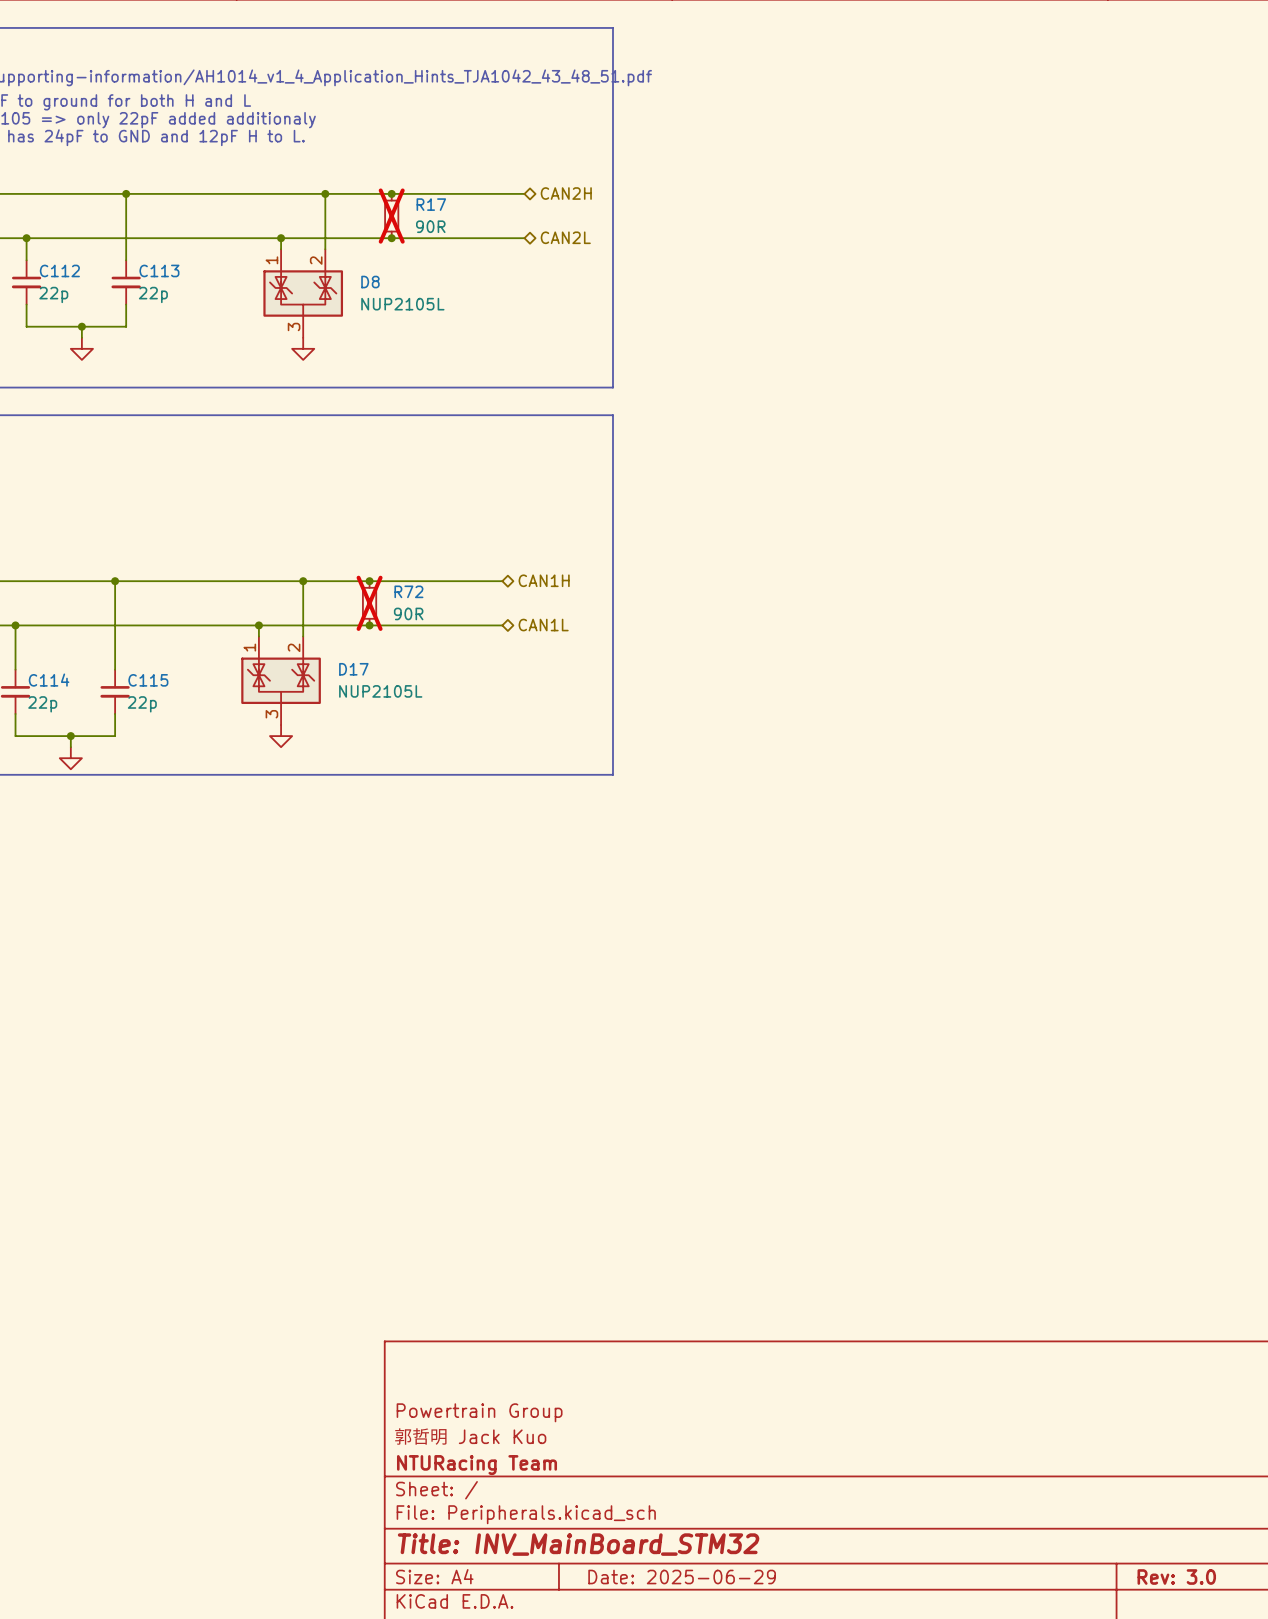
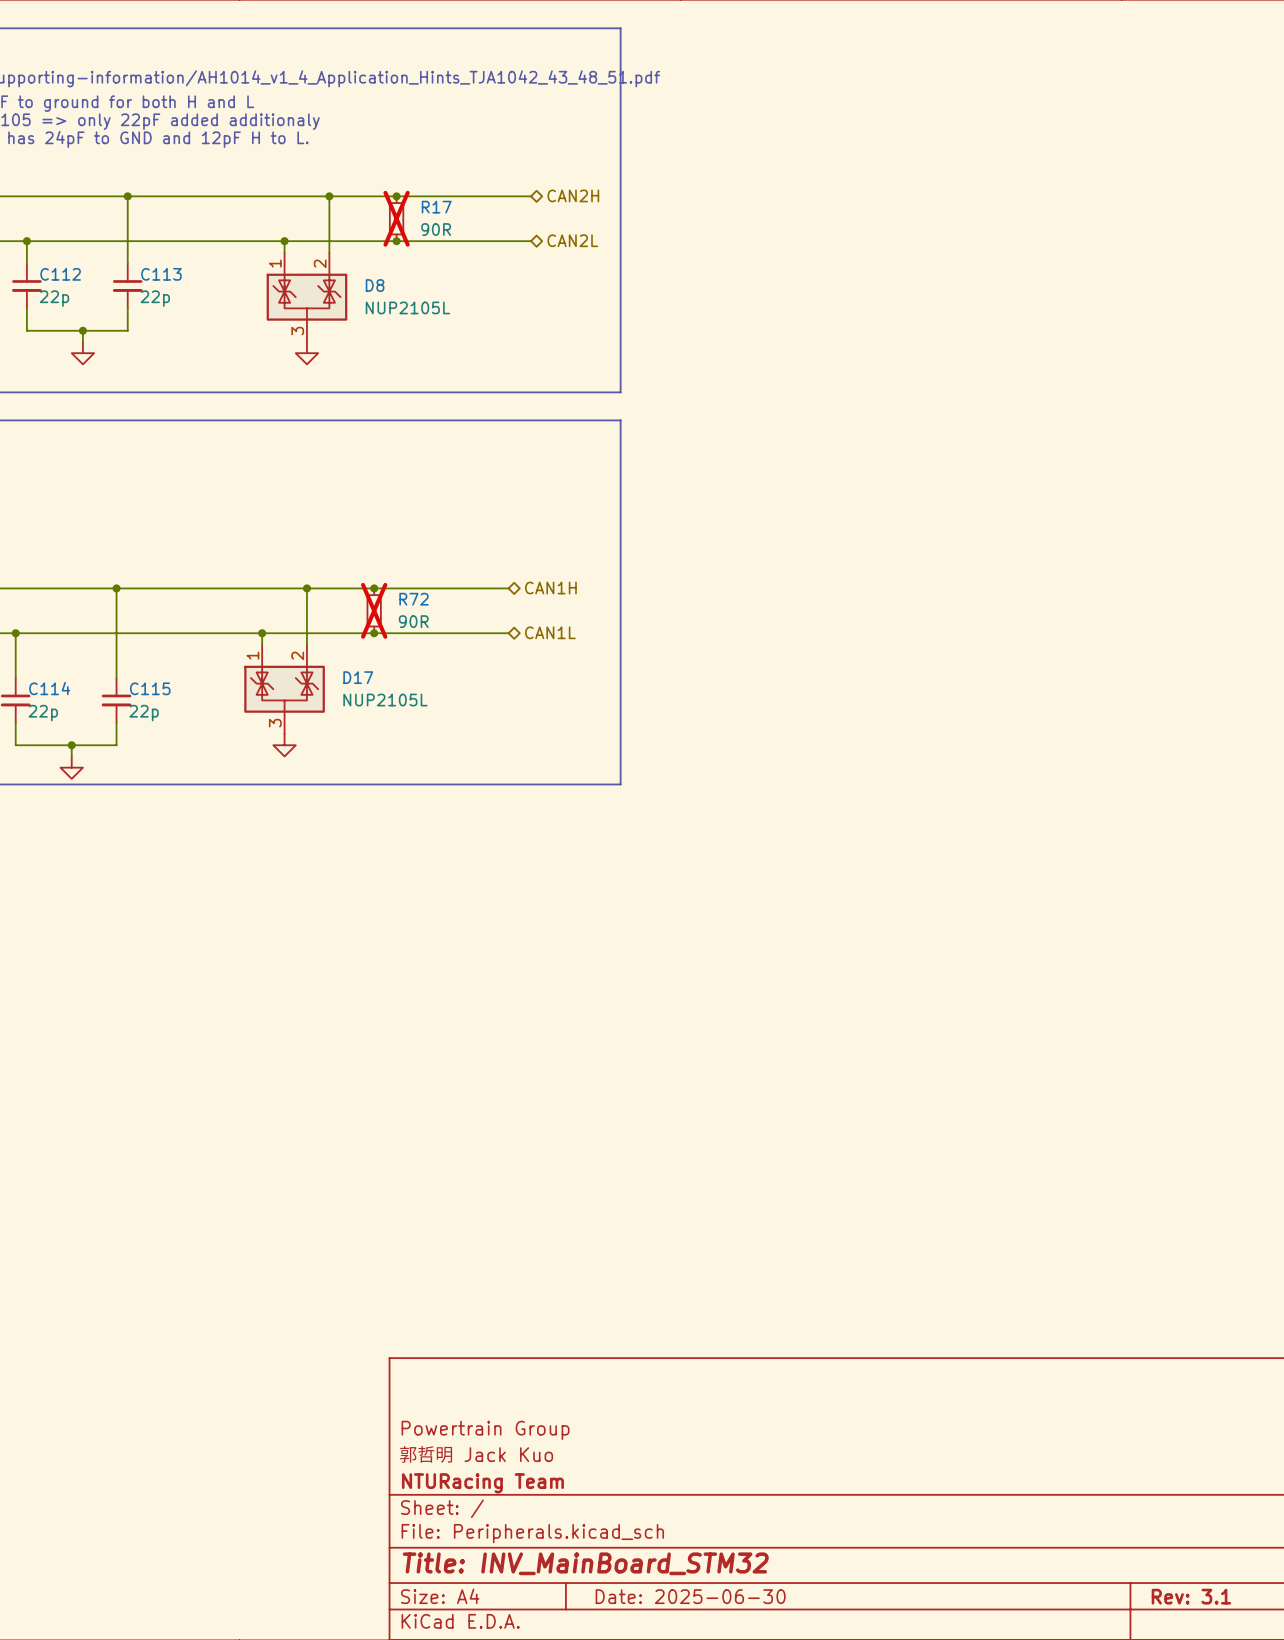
title block: Date: 2025-06-29 (682, 1577) -> Date: 2025-06-30 (690, 1596)
title block: Rev: 3.0 (1176, 1577) -> Rev: 3.1 (1191, 1596)

